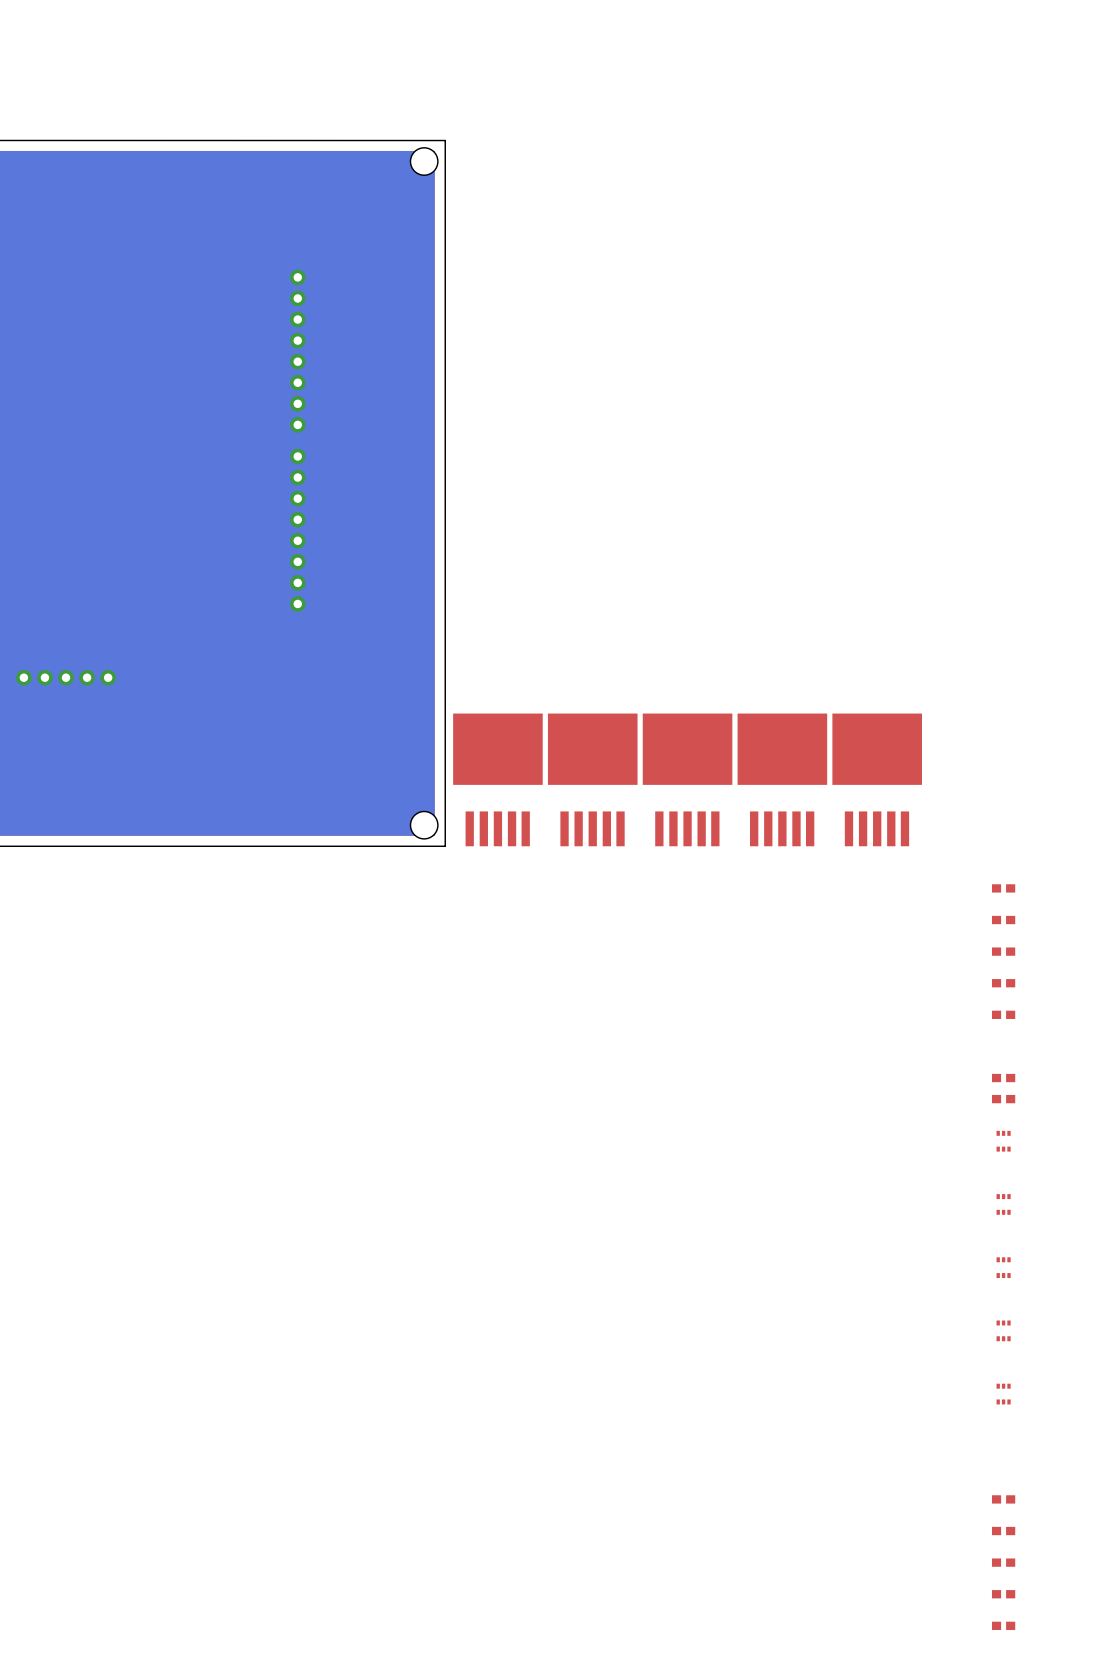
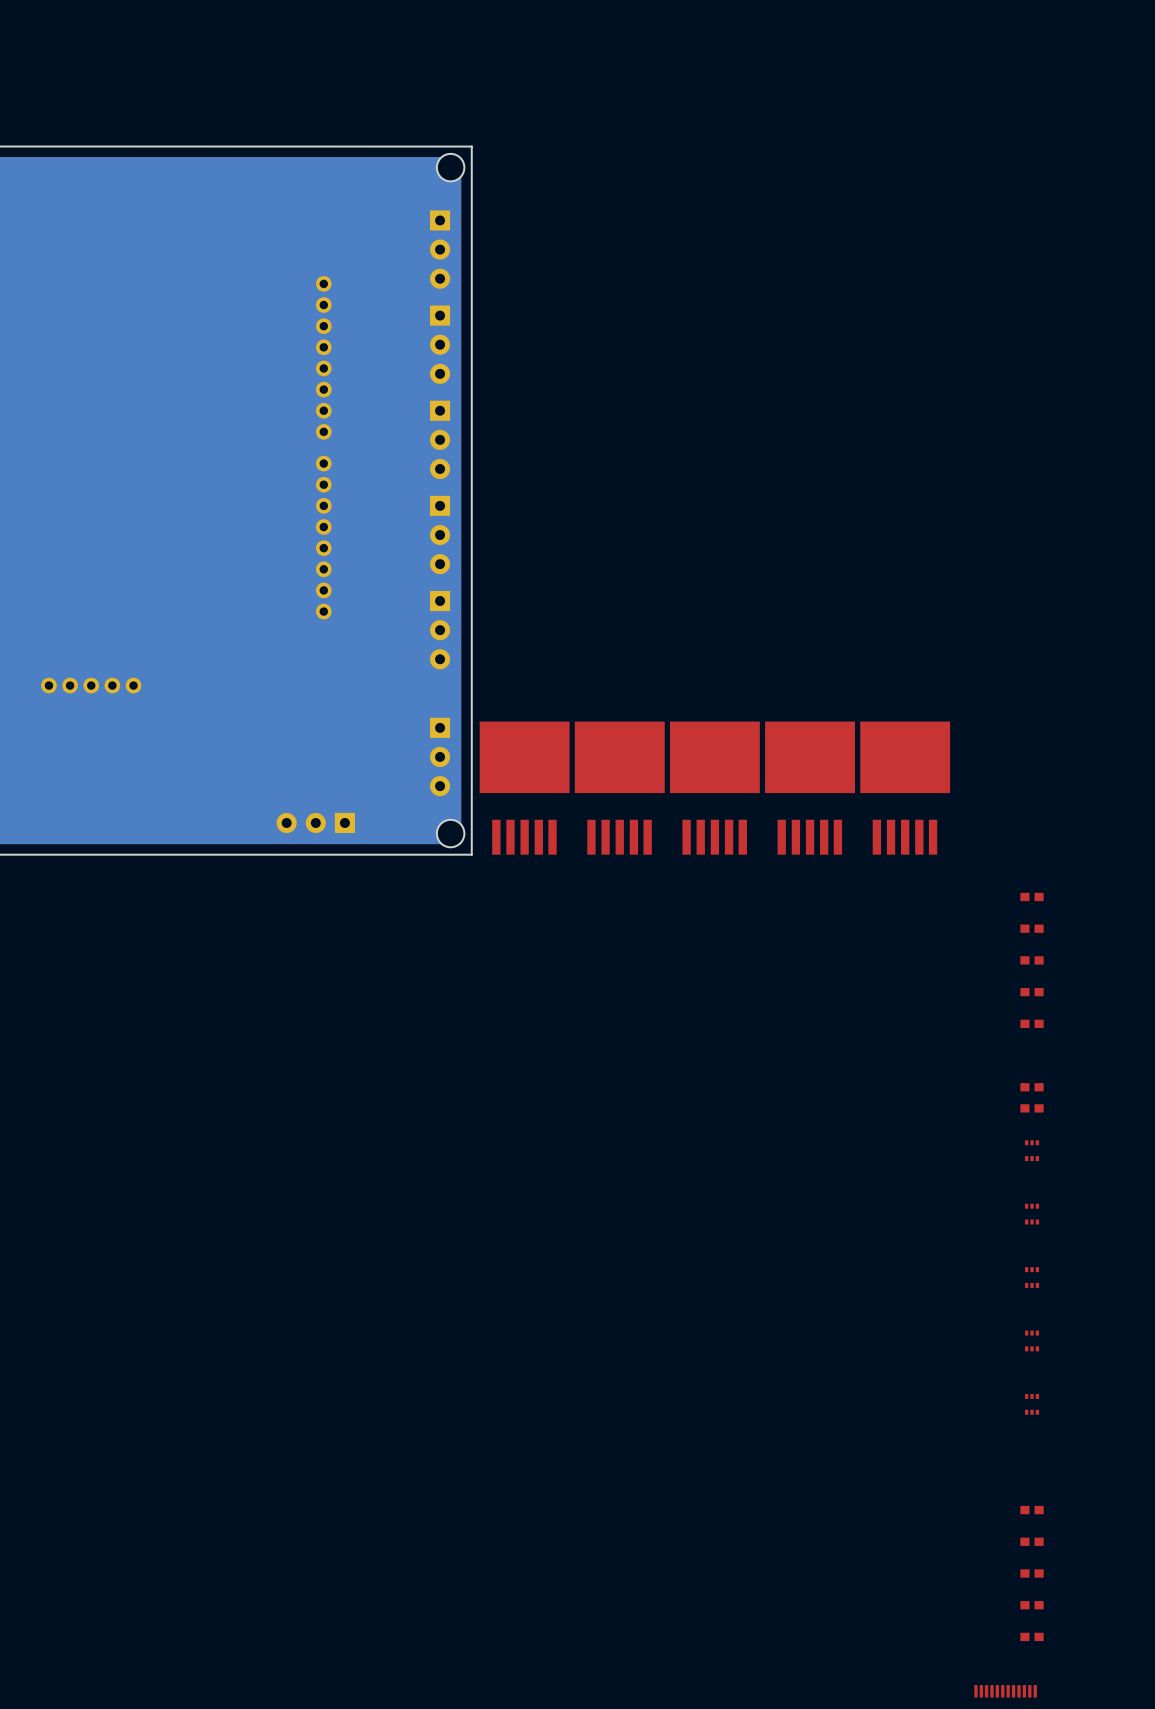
part: none -> (440, 249)
part: none -> (440, 344)
part: none -> (440, 439)
part: none -> (440, 535)
part: none -> (440, 630)
part: none -> (440, 756)
part: none -> (315, 822)

